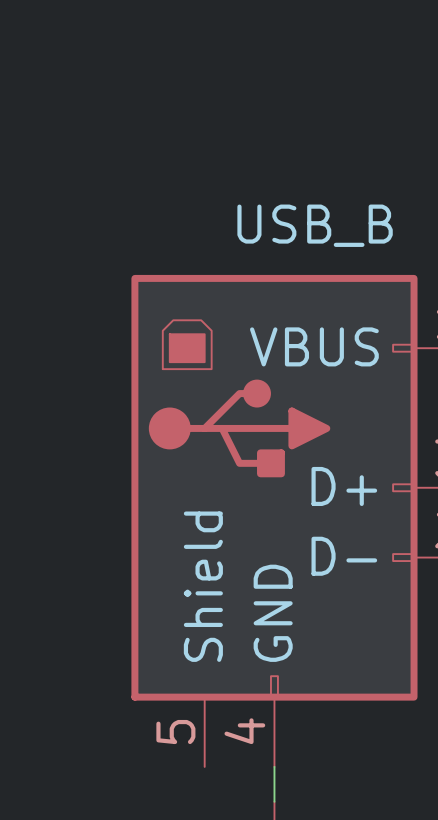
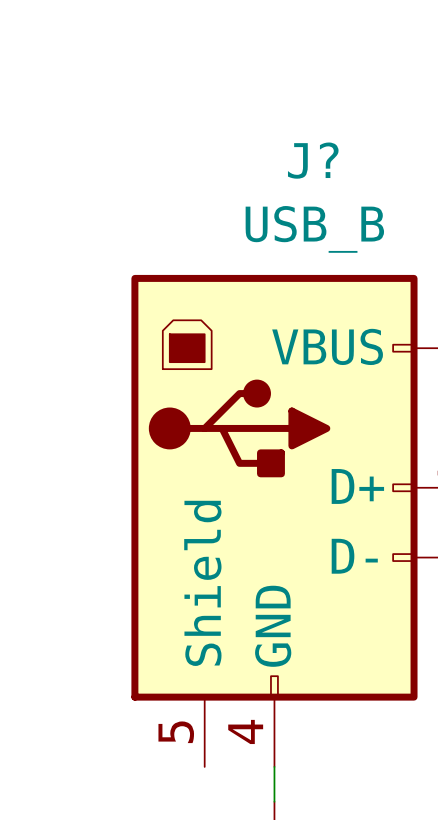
J? name: none -> J? (313, 160)

